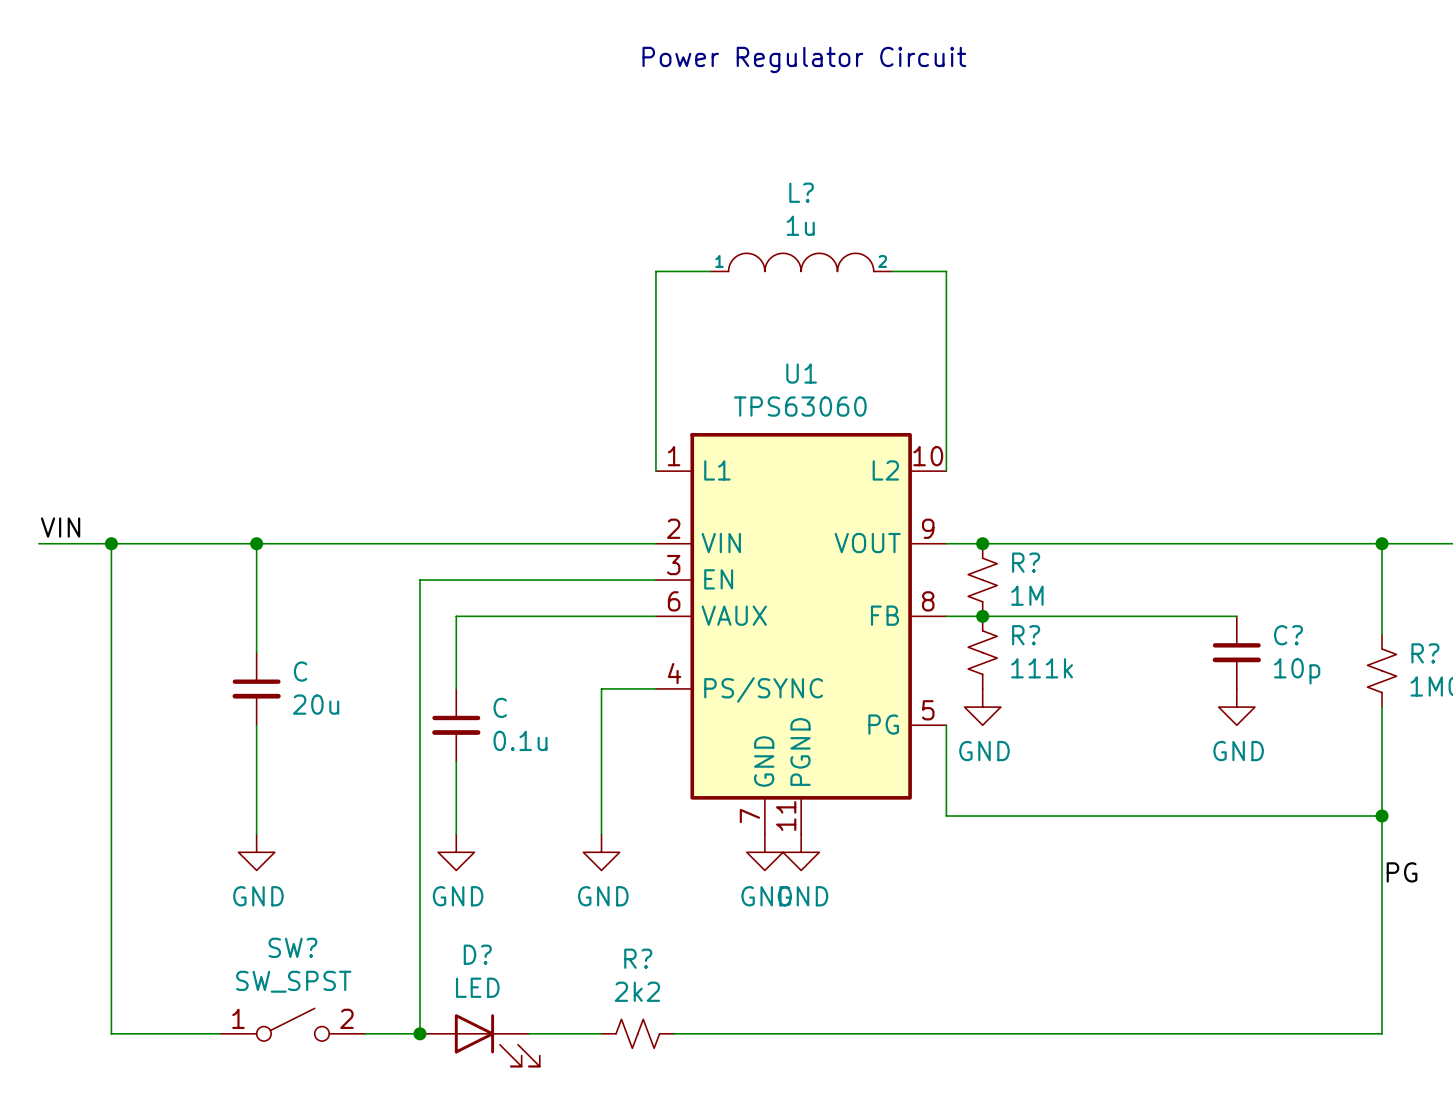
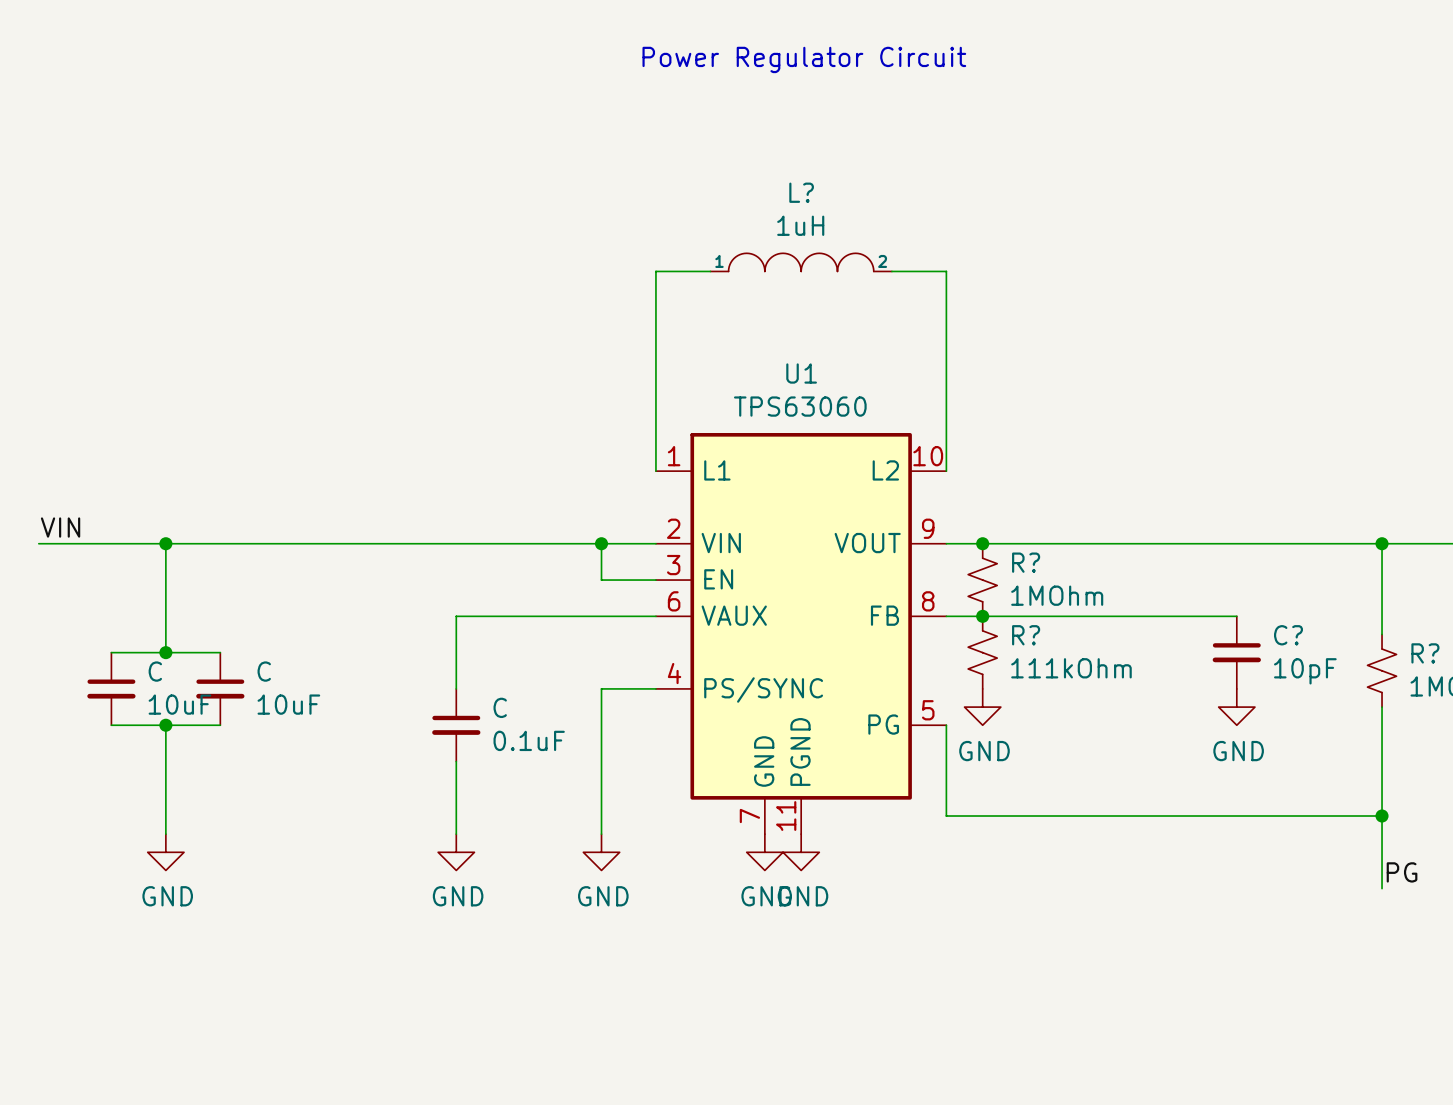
L? value: 1u (800, 225) -> 1uH (800, 225)
wire: (111, 543) (111, 1033) (220, 1033) -> none
junction: (111, 543) -> none
junction: none -> (165, 543)
wire: (256, 543) (256, 652) -> (165, 543) (165, 652)
junction: (256, 543) -> none
junction: none -> (601, 543)
wire: (601, 580) (419, 580) (419, 1033) (365, 1033) -> (601, 580) (601, 543)
R? value: 1M (1027, 595) -> 1MOhm (1057, 595)
wire: none -> (111, 652) (220, 652)
junction: none -> (165, 652)
R? value: 111k (1042, 668) -> 111kOhm (1071, 668)
C? value: 10p (1297, 671) -> 10pF (1305, 671)
C: none -> 10uF (111, 688)
C: none -> 10uF (220, 688)
C: 20u (256, 688) -> none
wire: none -> (111, 725) (220, 725)
junction: none -> (165, 725)
wire: (256, 725) (256, 834) -> (165, 725) (165, 834)
C value: 0.1u (520, 740) -> 0.1uF (529, 740)
power symbol position: GND (256, 852) -> GND (165, 852)
wire: (1382, 888) (1382, 1033) (674, 1033) -> none
SW?: SW_SPST (292, 1024) -> none
junction: (419, 1033) -> none
wire: (528, 1033) (601, 1033) -> none
R?: 2k2 (637, 1033) -> none
D?: LED (479, 1040) -> none

